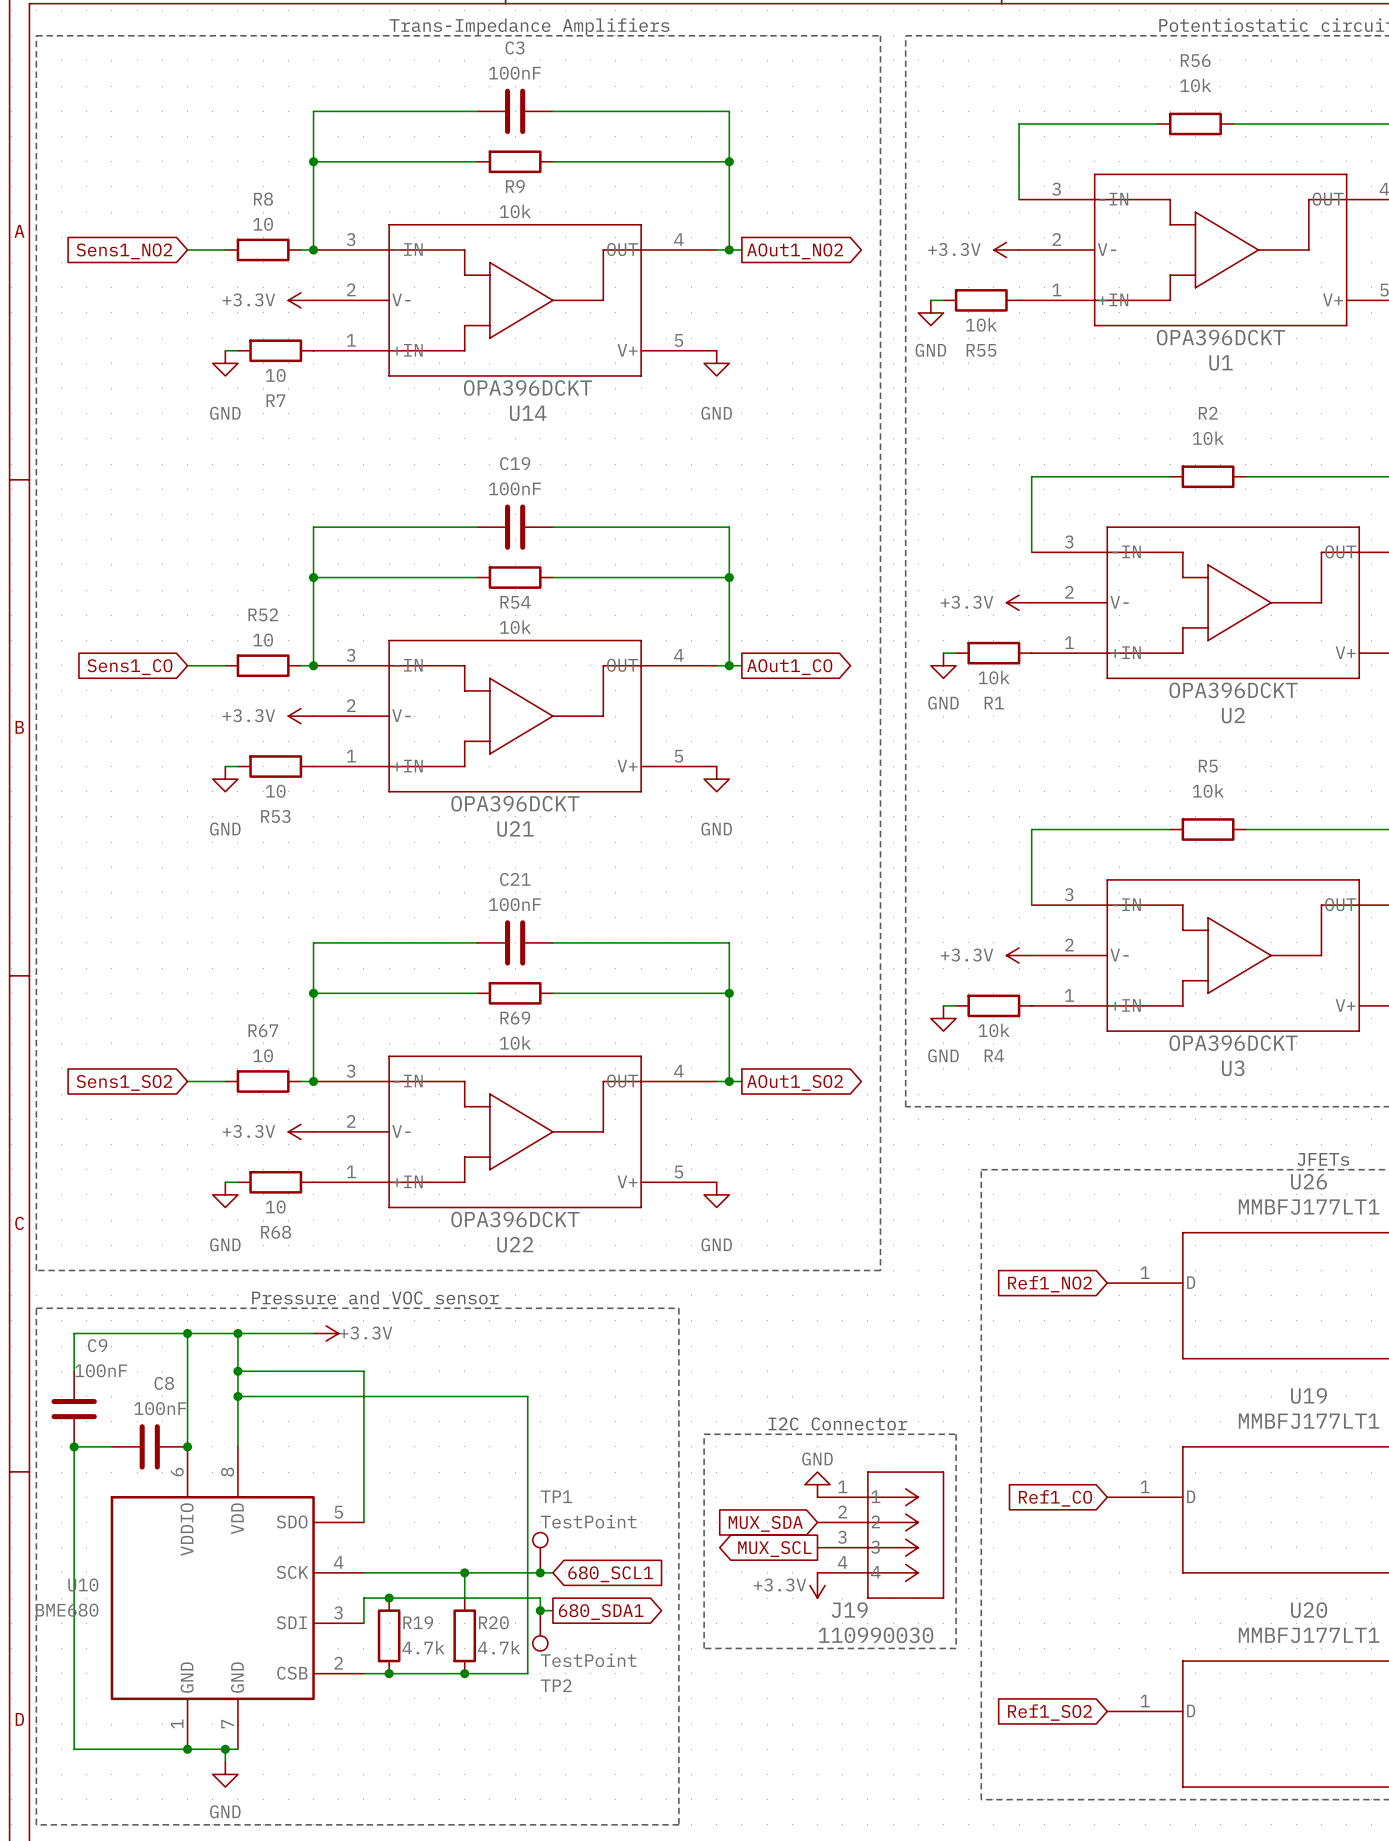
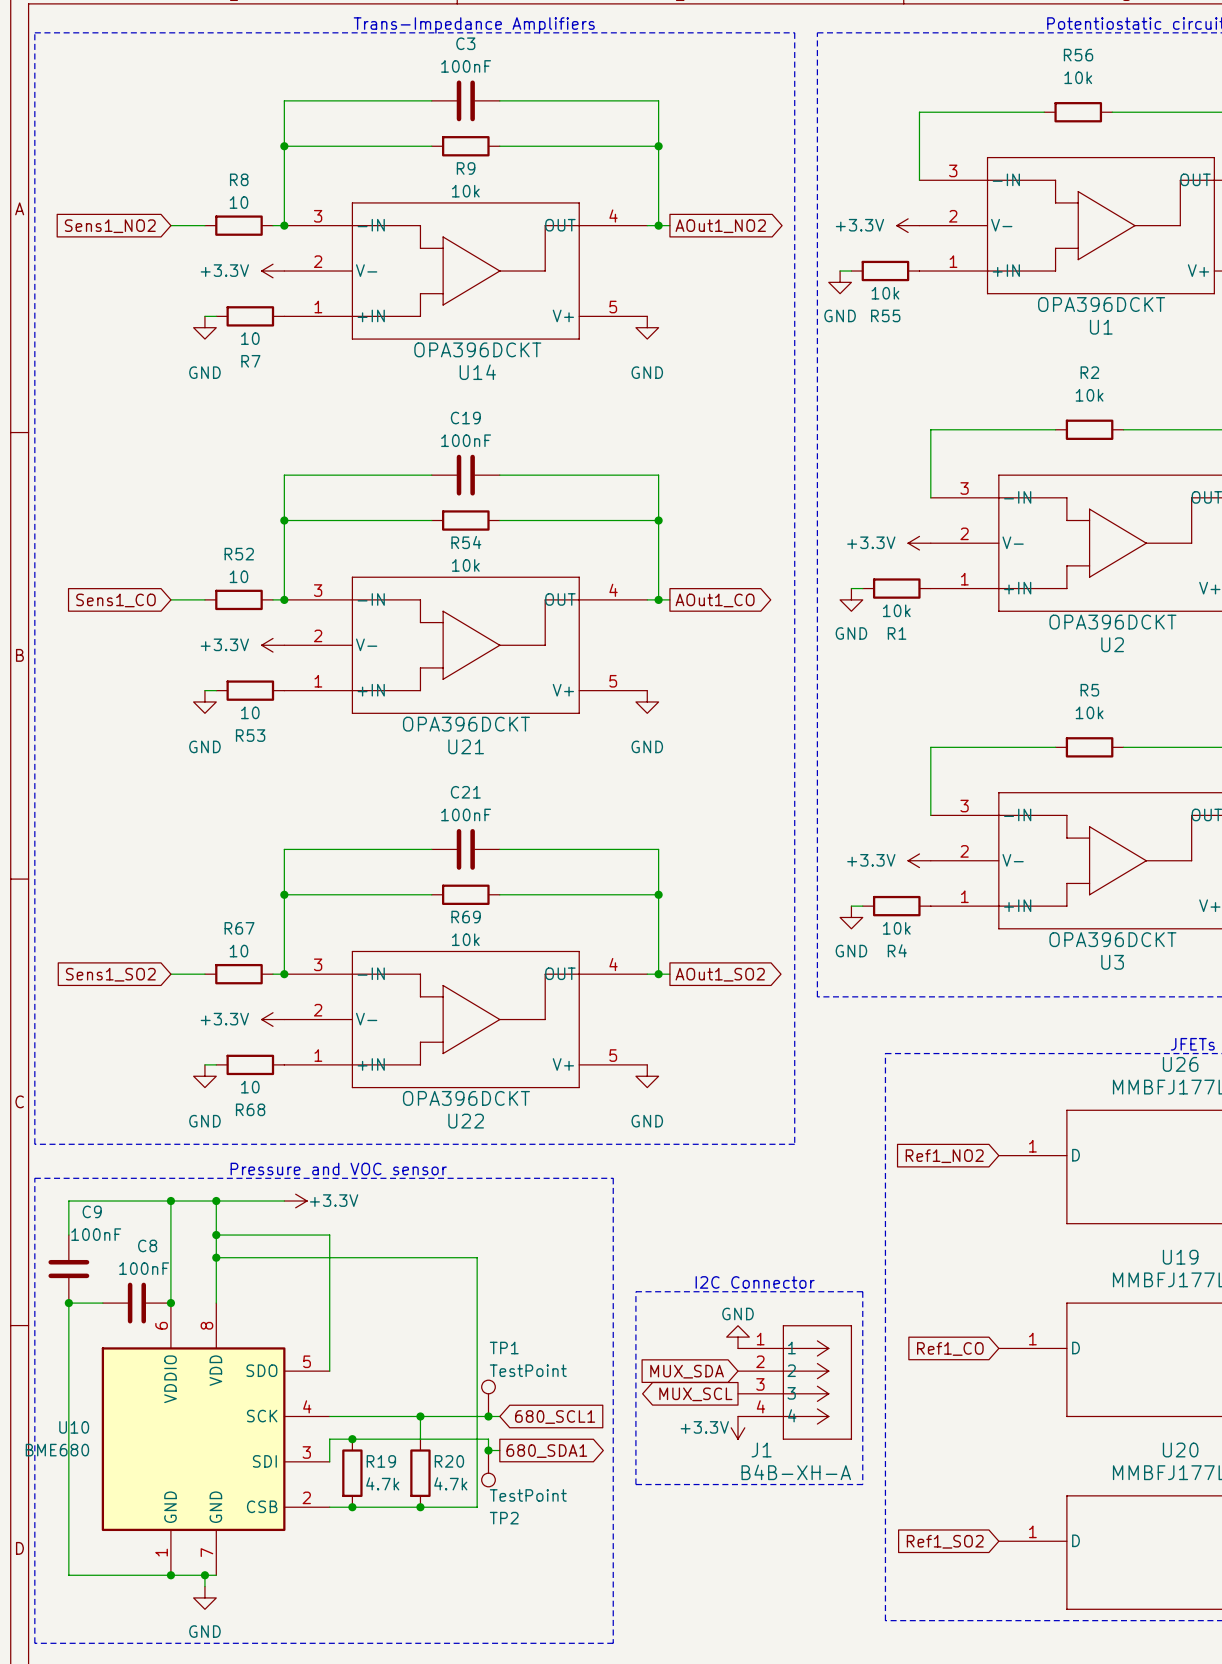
J19 name: J19 (849, 1610) -> J1 (761, 1450)
J19 value: 110990030 (875, 1635) -> B4B-XH-A (796, 1472)

